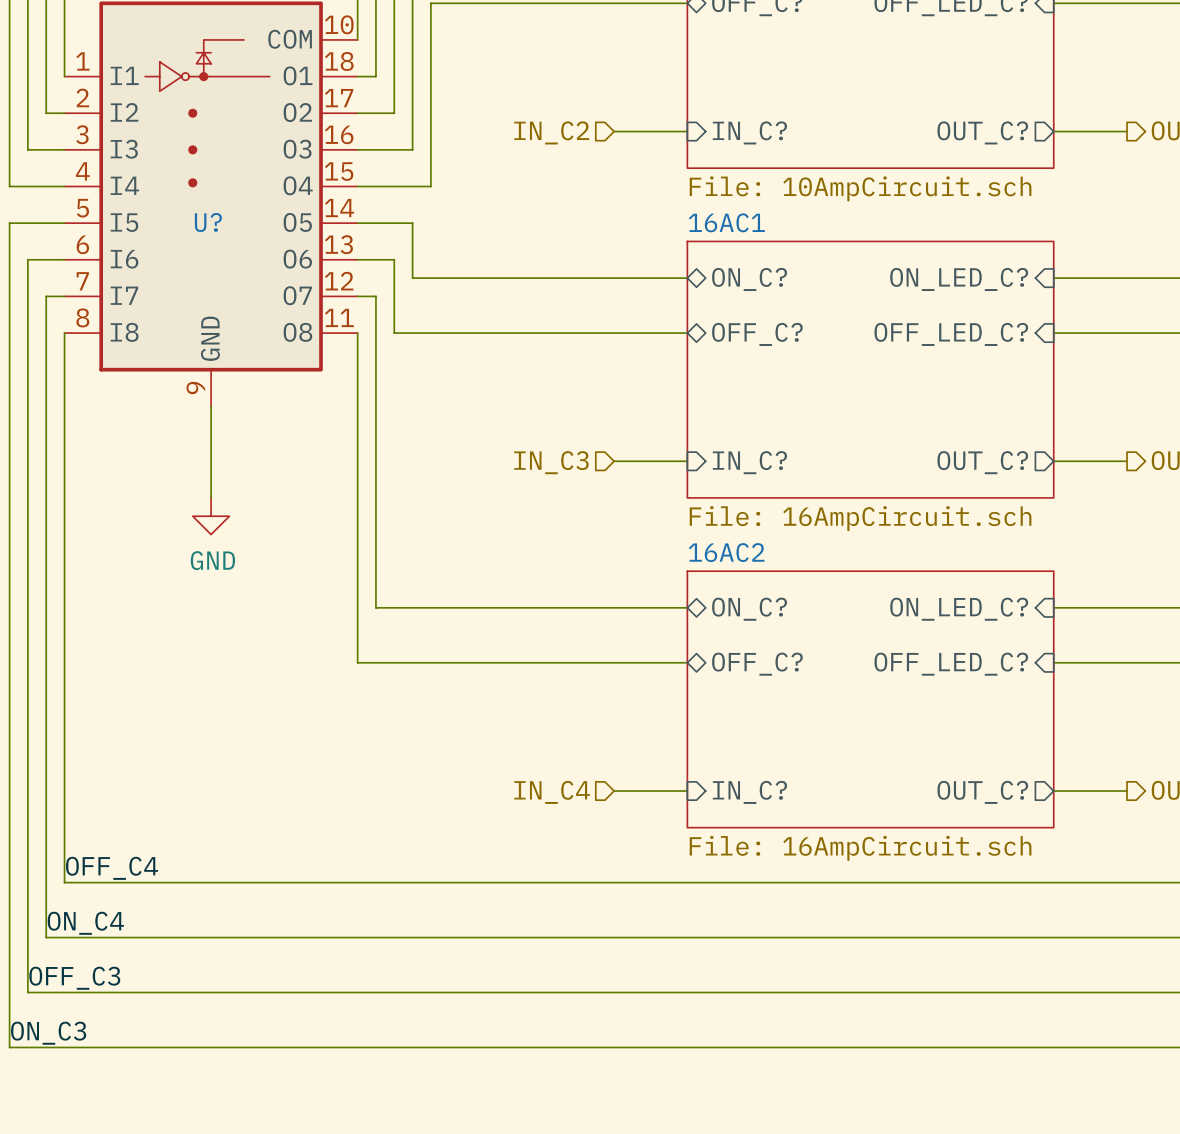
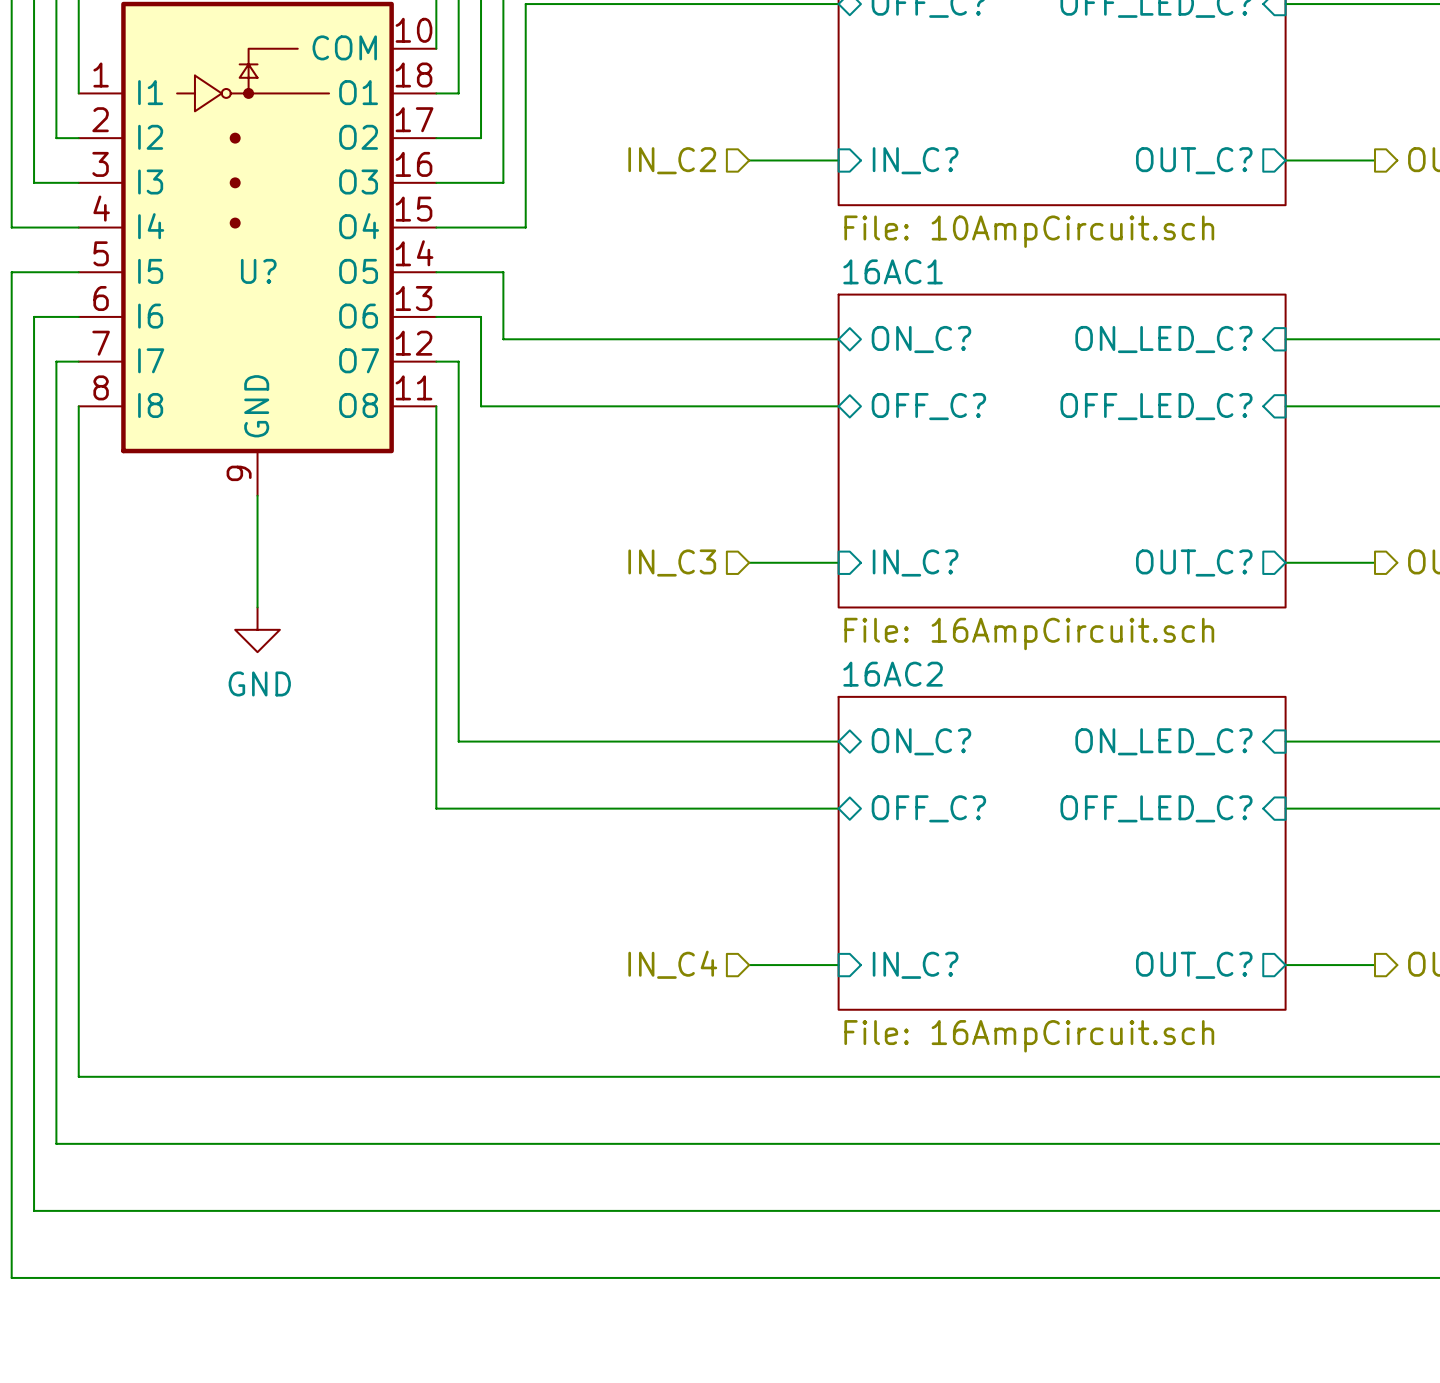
label: OFF_C4 (112, 868) -> none
label: ON_C4 (85, 923) -> none
label: OFF_C3 (74, 978) -> none
label: ON_C3 (48, 1033) -> none

